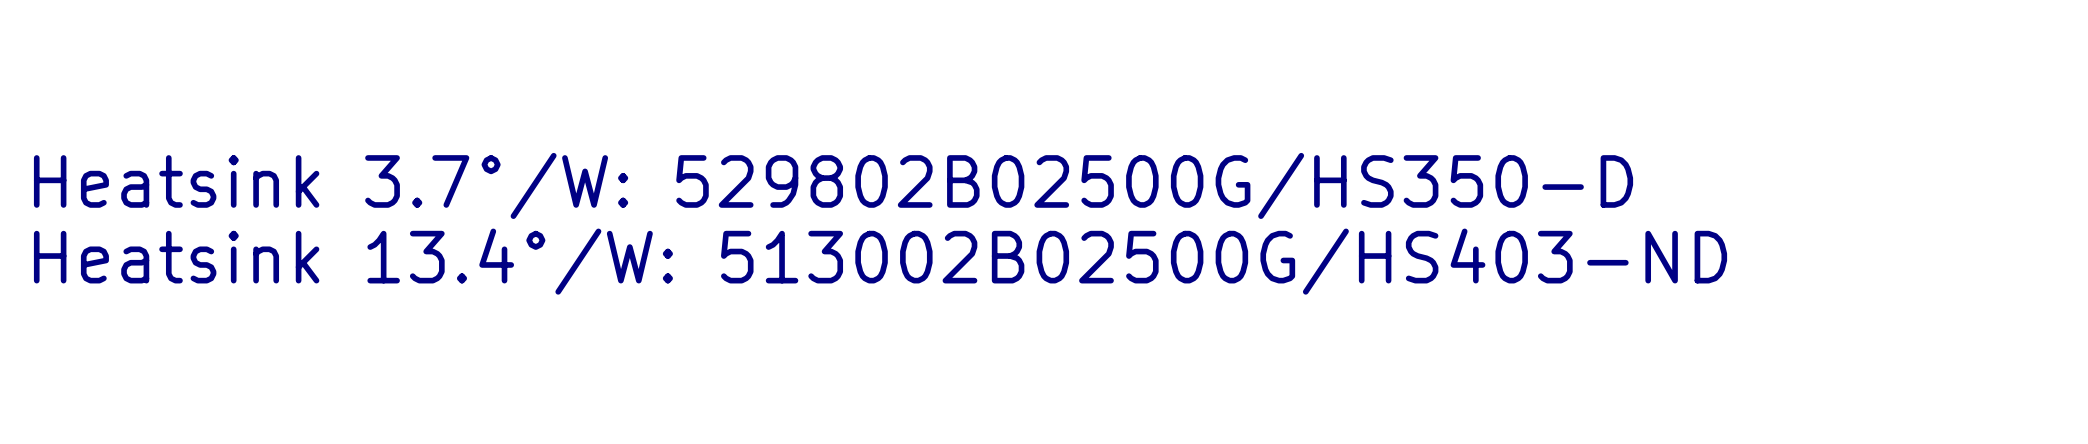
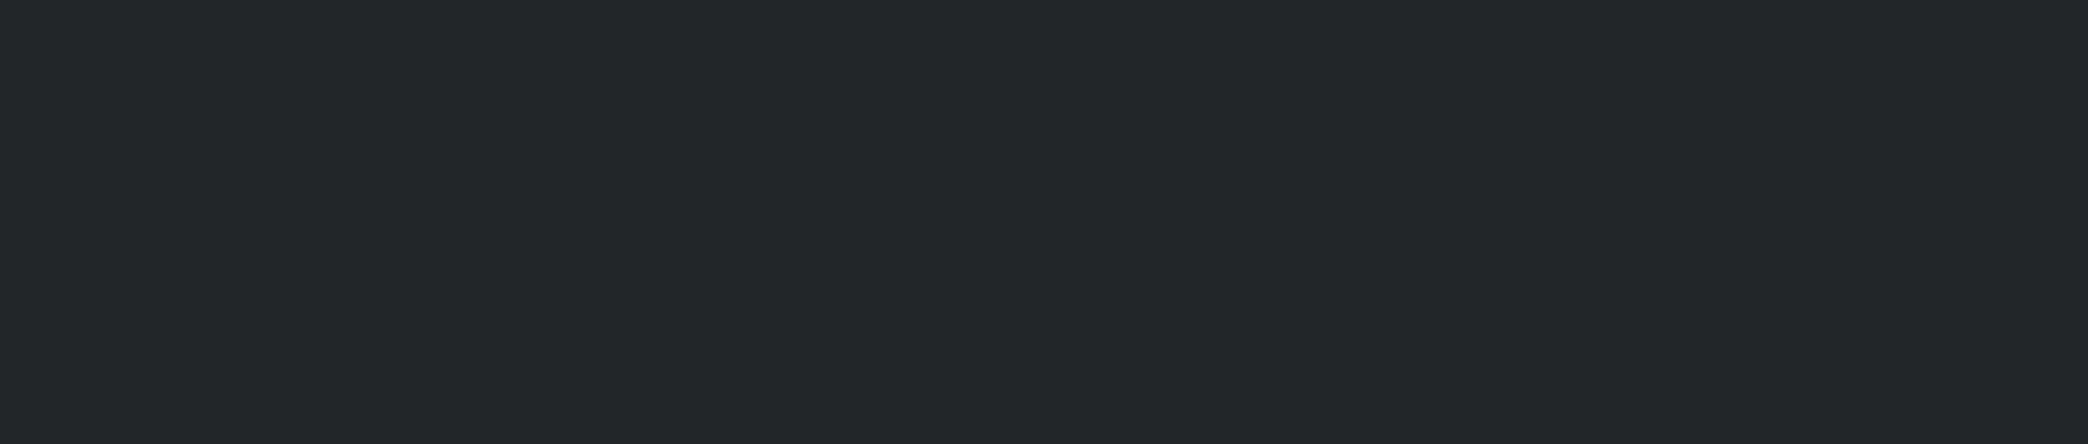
text: Heatsink 3.7°/W: 529802B02500G/HS350-D (833, 185) -> none
text: Heatsink 13.4°/W: 513002B02500G/HS403-ND (880, 261) -> none

